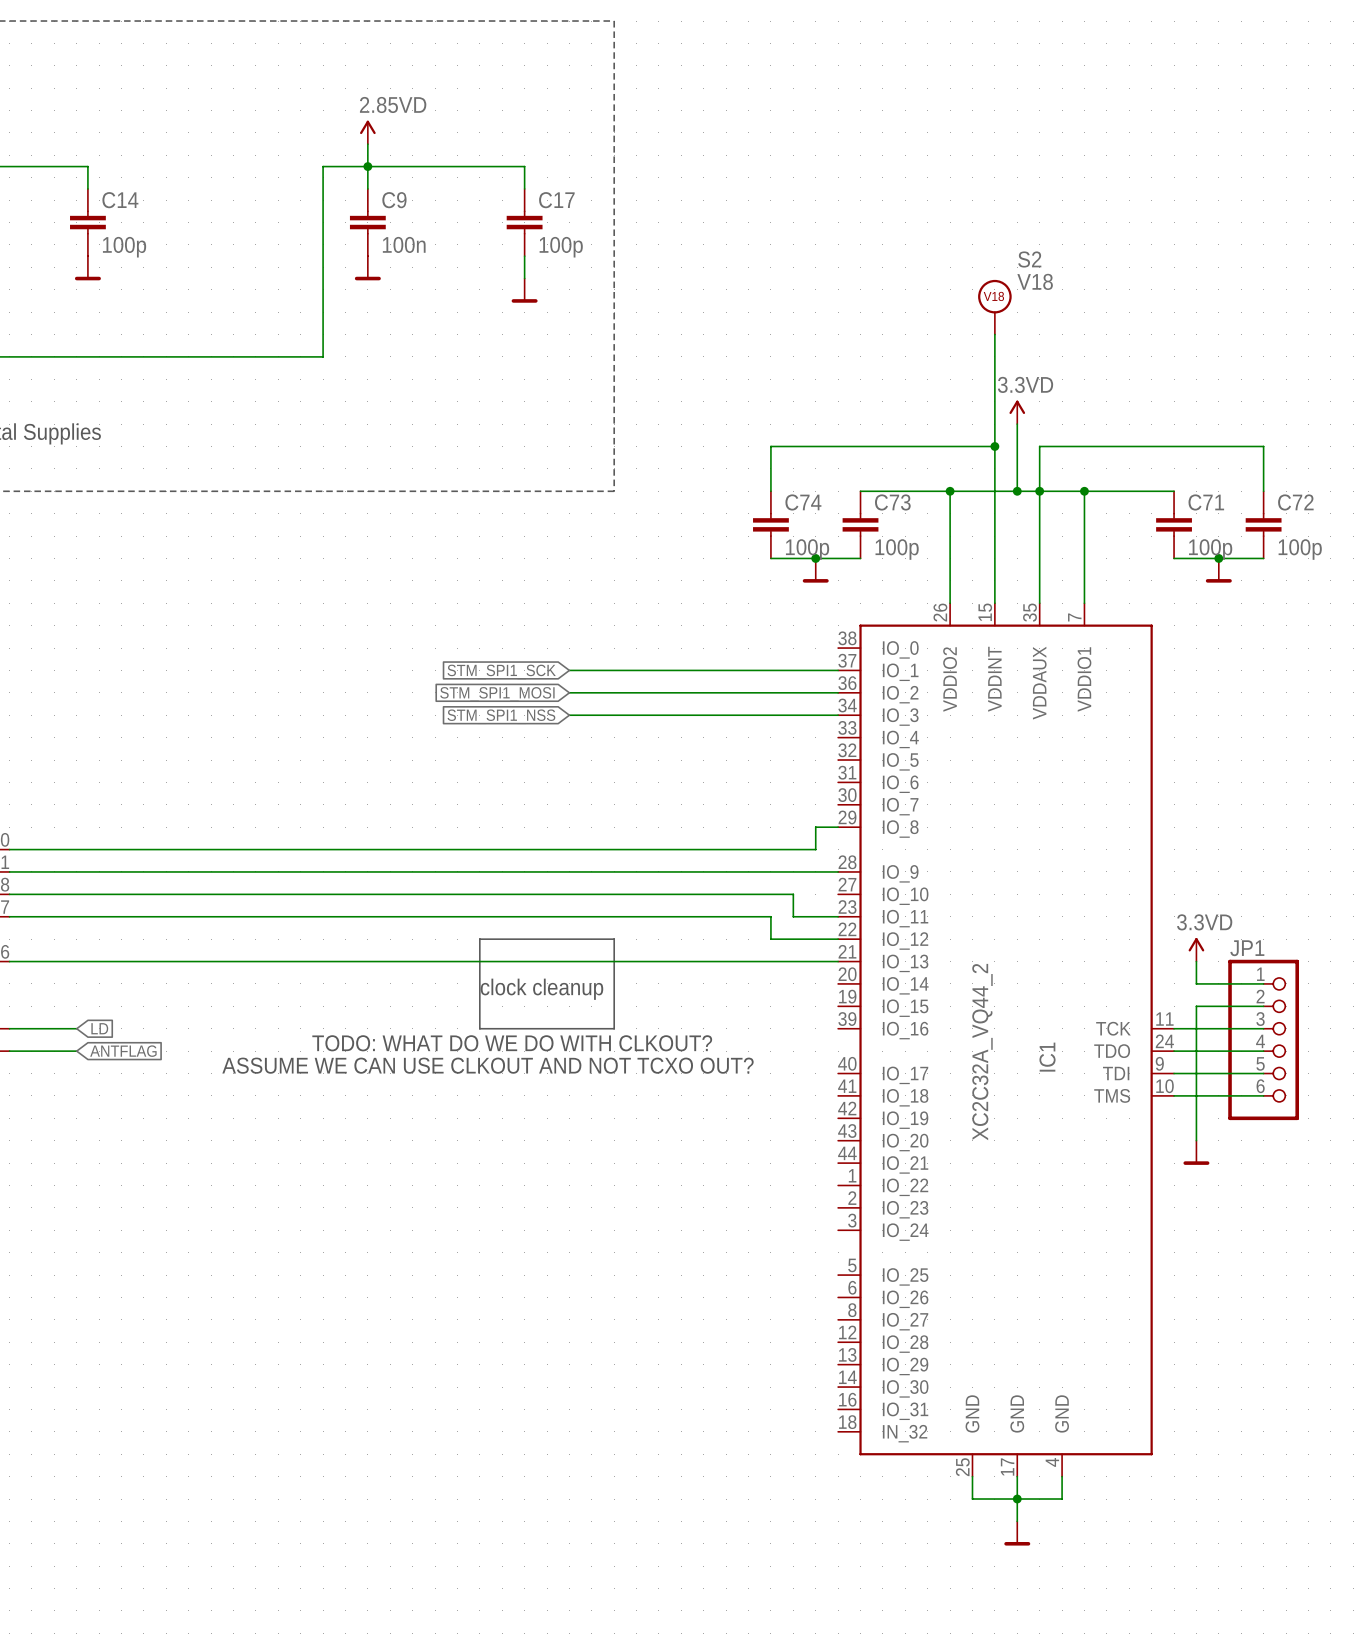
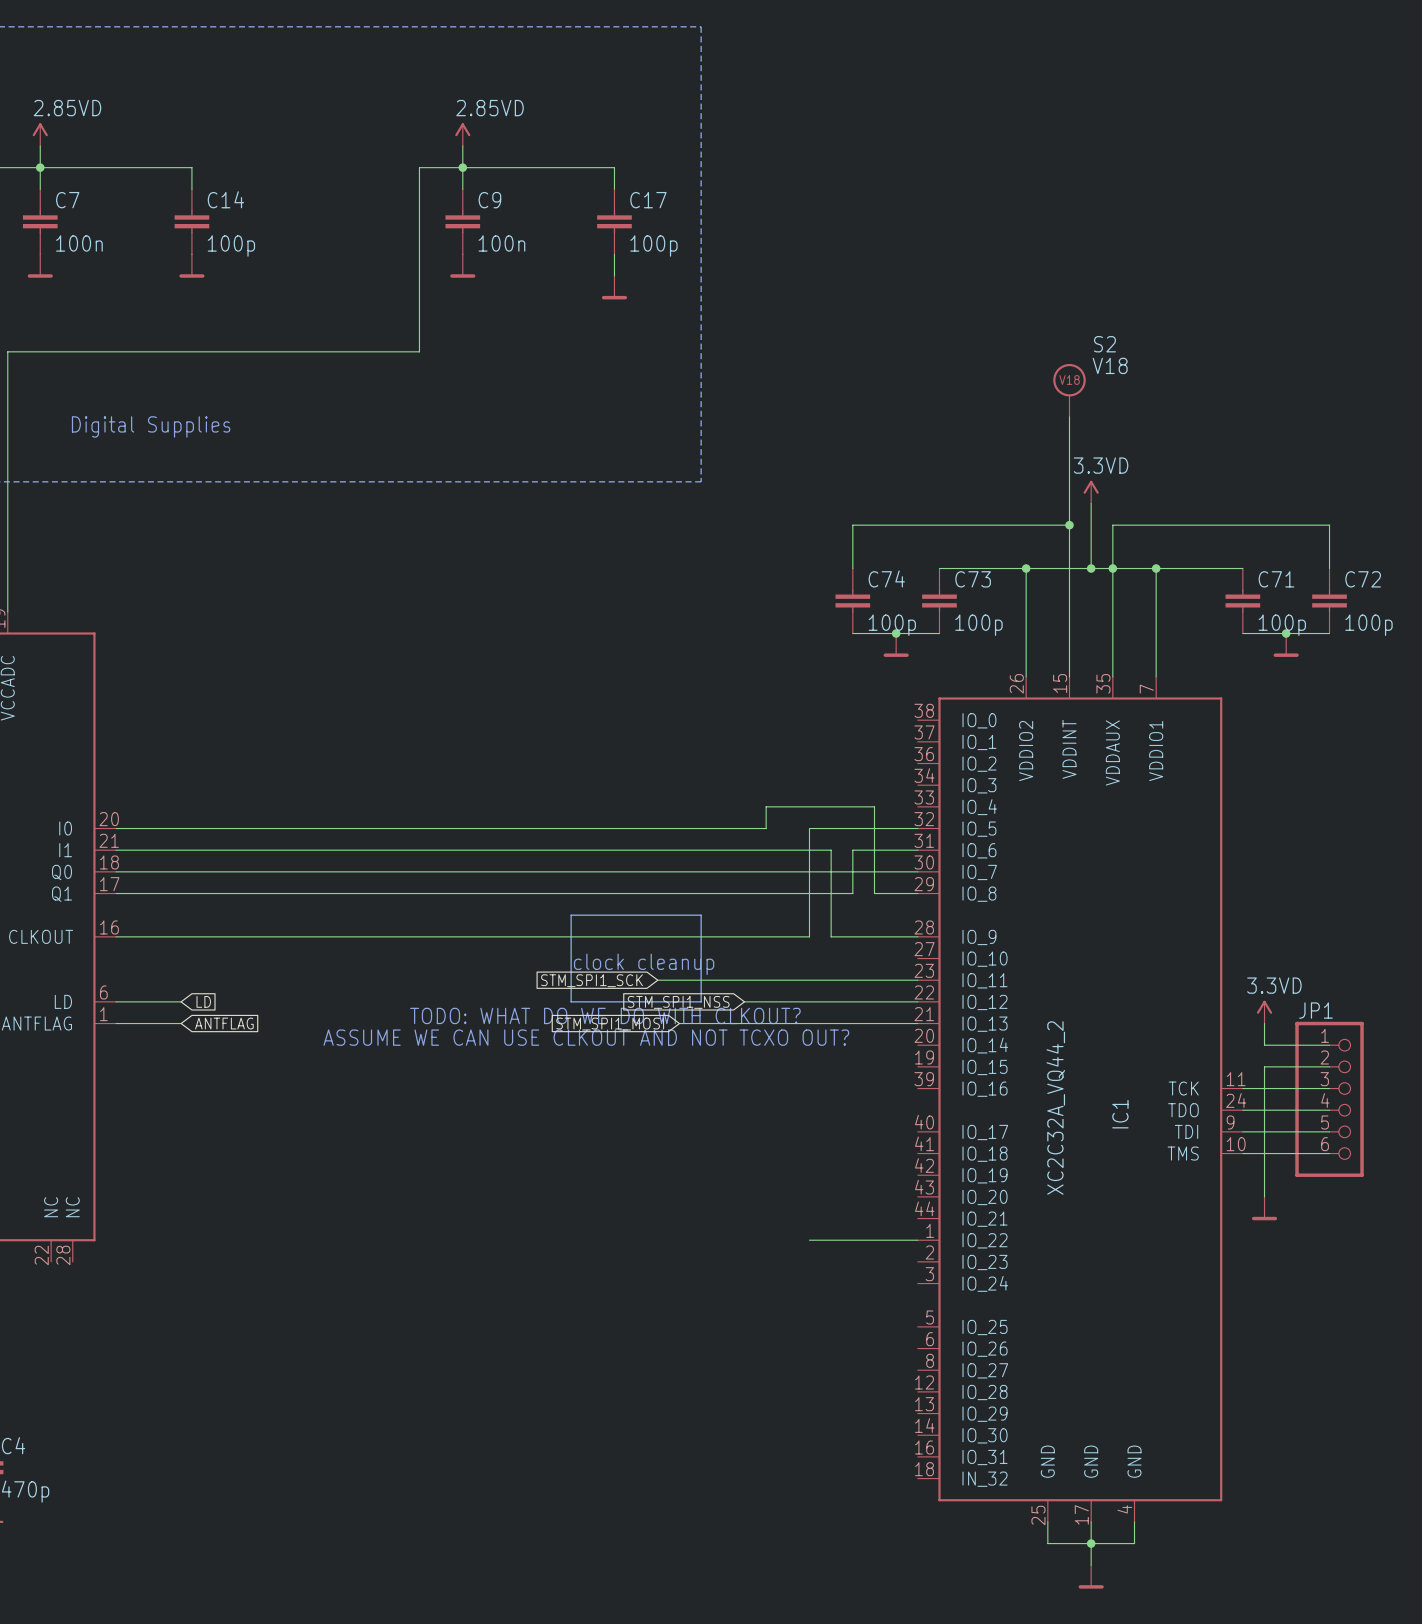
S2 position: V18 (994, 307) -> V18 (1069, 390)
wire: (994, 334) (994, 424) -> none
power symbol position: 3.3VD (1017, 412) -> 3.3VD (1091, 492)
wire: (1017, 424) (1017, 491) -> (1091, 503) (1091, 568)
wire: (994, 446) (770, 446) (770, 491) -> (1069, 525) (852, 525) (852, 568)
junction: (994, 446) -> none
wire: (860, 491) (1174, 491) -> (939, 568) (1242, 568)
wire: (950, 491) (950, 580) -> (1026, 590) (1026, 676)
junction: (950, 491) -> none
junction: (1017, 491) -> none
junction: (1039, 491) -> none
wire: (1084, 491) (1084, 580) -> (1156, 590) (1156, 676)
junction: (1084, 491) -> none
wire: (1263, 491) (1263, 446) (1039, 446) (1039, 536) -> (1329, 568) (1329, 525) (1112, 525)
C74 position: (770, 524) -> (852, 601)
C73 position: (860, 524) -> (939, 601)
C71 position: (1174, 524) -> (1242, 601)
C72 position: (1263, 524) -> (1329, 601)
junction: none -> (1069, 525)
wire: (770, 558) (860, 558) -> (852, 633) (939, 633)
junction: (815, 558) -> none
wire: (1174, 558) (1263, 558) -> (1242, 633) (1329, 633)
junction: (1218, 558) -> none
power symbol position: (815, 570) -> (896, 645)
power symbol position: (1218, 570) -> (1286, 645)
junction: none -> (1026, 568)
junction: none -> (1091, 568)
junction: none -> (1112, 568)
junction: none -> (1156, 568)
wire: none -> (1069, 590) (1069, 676)
wire: none -> (1112, 590) (1112, 676)
junction: none -> (896, 633)
junction: none -> (1286, 633)
wire: (569, 670) (838, 670) -> none
global label: STM_SPI1_SCK (501, 671) -> none
wire: (569, 692) (838, 692) -> none
global label: STM_SPI1_MOSI (497, 694) -> none
wire: (569, 715) (838, 715) -> none
global label: STM_SPI1_NSS (501, 716) -> none
wire: (838, 827) (815, 827) (815, 849) -> (917, 828) (896, 828)
wire: (681, 849) (726, 849) -> (809, 936) (809, 828)
wire: none -> (766, 828) (766, 806) (874, 806) (874, 871) (917, 871)
wire: (748, 871) (770, 871) -> (852, 893) (852, 850)
wire: (770, 916) (770, 939) (838, 939) -> none
power symbol position: 3.3VD (1196, 949) -> 3.3VD (1264, 1012)
wire: (726, 961) (748, 961) -> (831, 850) (831, 936)
wire: (1196, 961) (1196, 983) (1263, 983) -> none
wire: none -> (657, 980) (917, 980)
wire: (1263, 1006) (1196, 1006) (1196, 1051) -> none
global label: none -> STM_SPI1_SCK (592, 980)
wire: none -> (744, 1001) (917, 1001)
wire: (1174, 1028) (1263, 1028) -> (1242, 1088) (1329, 1088)
global label: none -> STM_SPI1_NSS (678, 1002)
IC1 position: (1006, 1039) -> (1080, 1099)
JP1 position: (1263, 1039) -> (1329, 1099)
wire: none -> (679, 1023) (917, 1023)
wire: (1174, 1051) (1263, 1051) -> (1242, 1110) (1329, 1110)
global label: none -> STM_SPI1_MOSI (610, 1024)
wire: (1174, 1073) (1196, 1073) (1196, 1095) (1174, 1095) -> none
wire: none -> (1264, 1110) (1264, 1196)
power symbol position: (1196, 1152) -> (1264, 1208)
wire: none -> (1242, 1131) (1329, 1131)
wire: none -> (1242, 1153) (1329, 1153)
wire: none -> (809, 1240) (917, 1240)
wire: (972, 1476) (972, 1499) (1062, 1499) (1062, 1476) -> (1047, 1521) (1047, 1543) (1134, 1543) (1134, 1521)
wire: (1017, 1476) (1017, 1521) -> (1091, 1521) (1091, 1565)
junction: (1017, 1499) -> none
power symbol position: (1017, 1533) -> (1091, 1576)
junction: none -> (1091, 1543)

